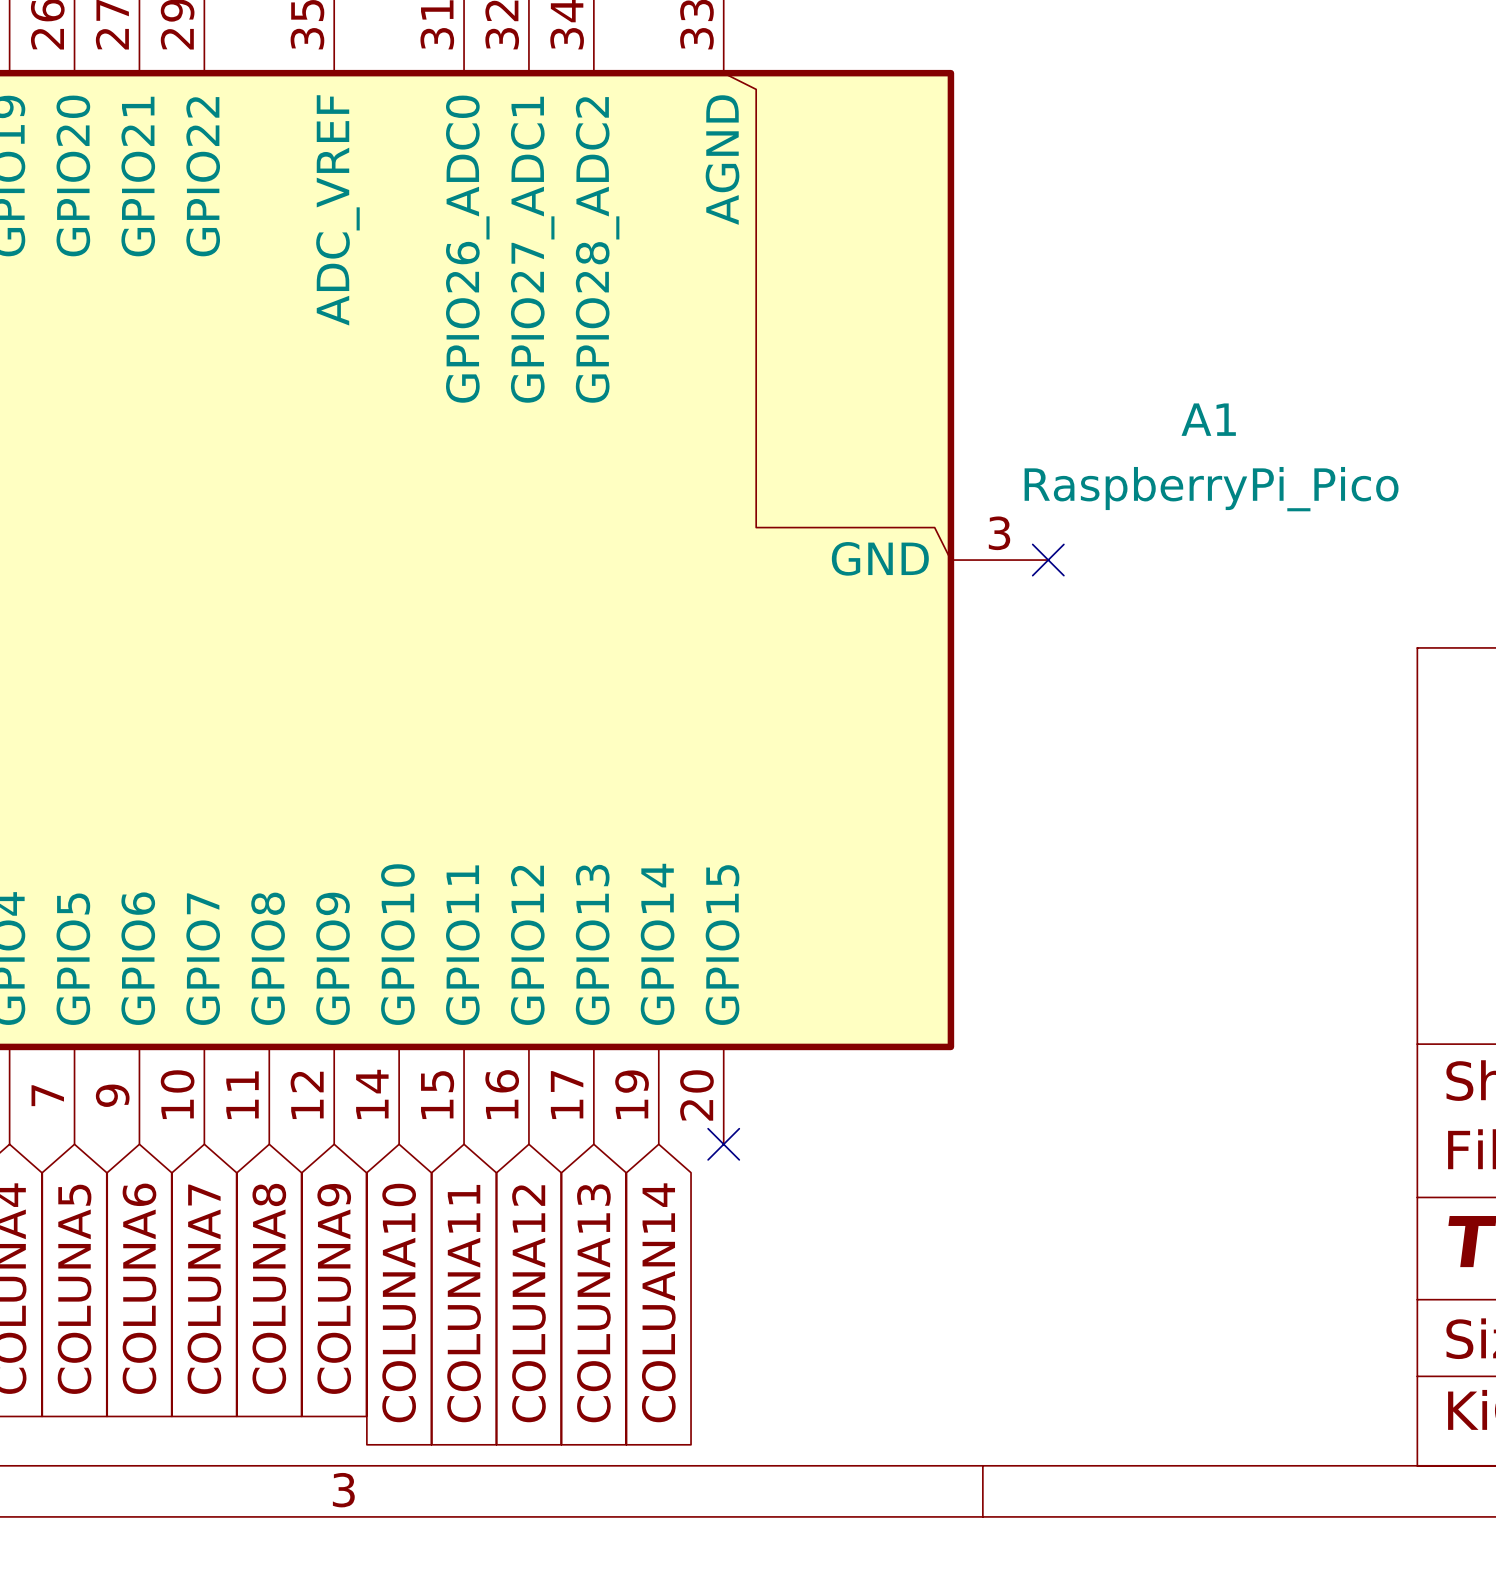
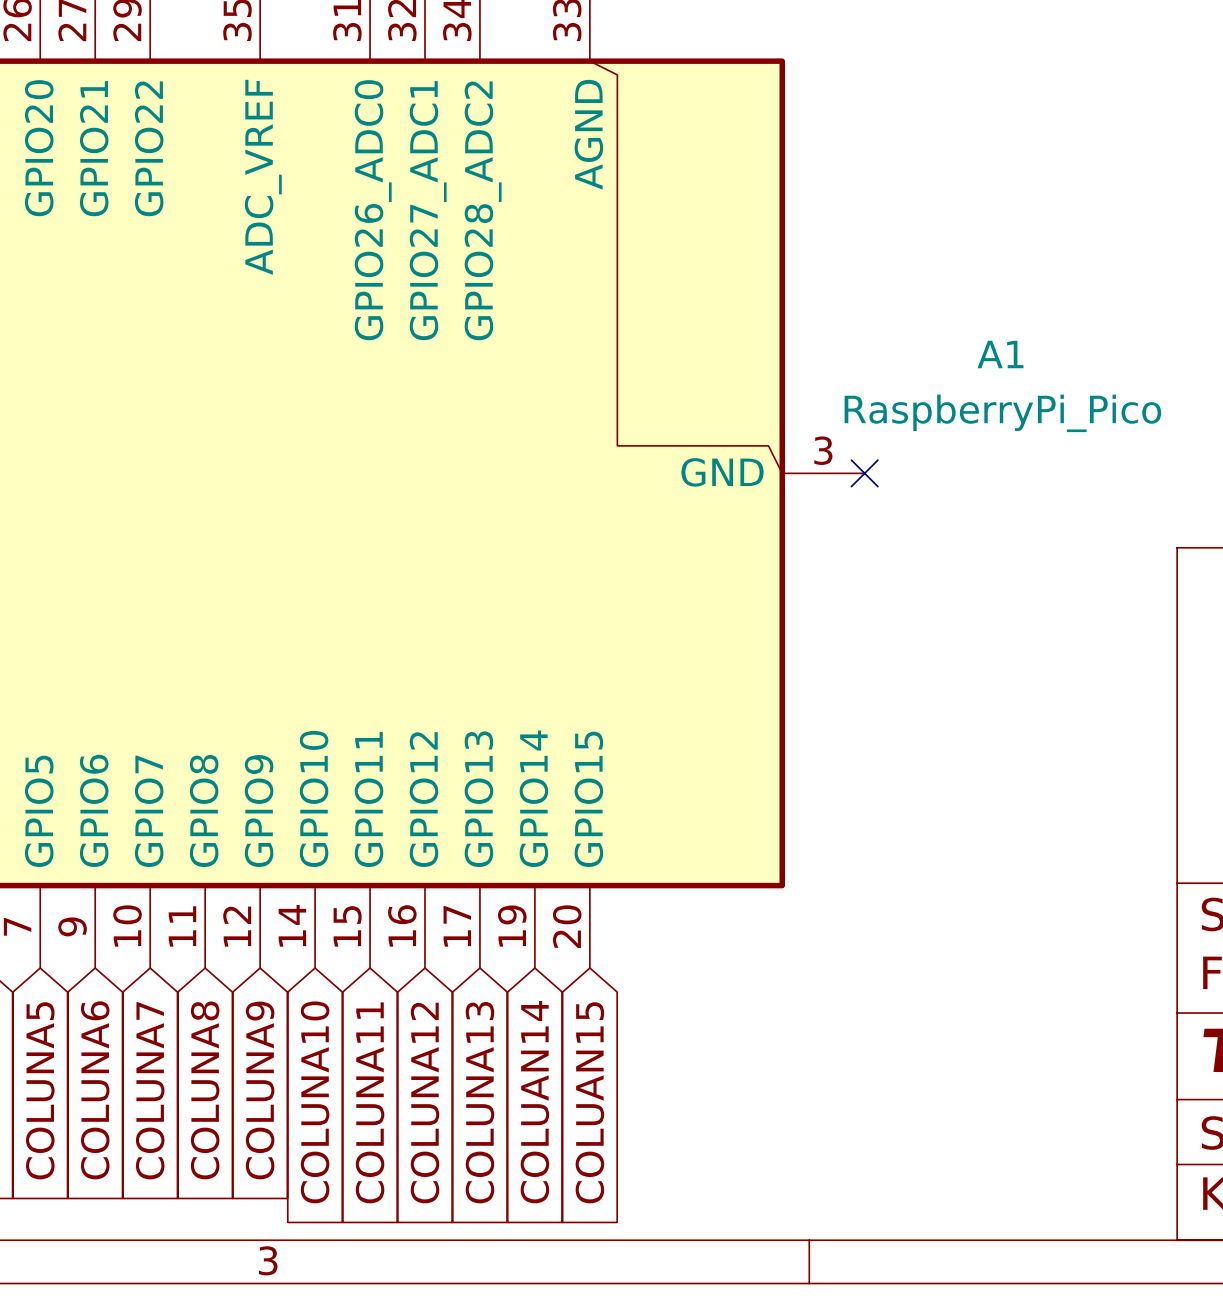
no-connect mark: (723, 1144) -> none
global label: none -> COLUAN15 (589, 1102)

